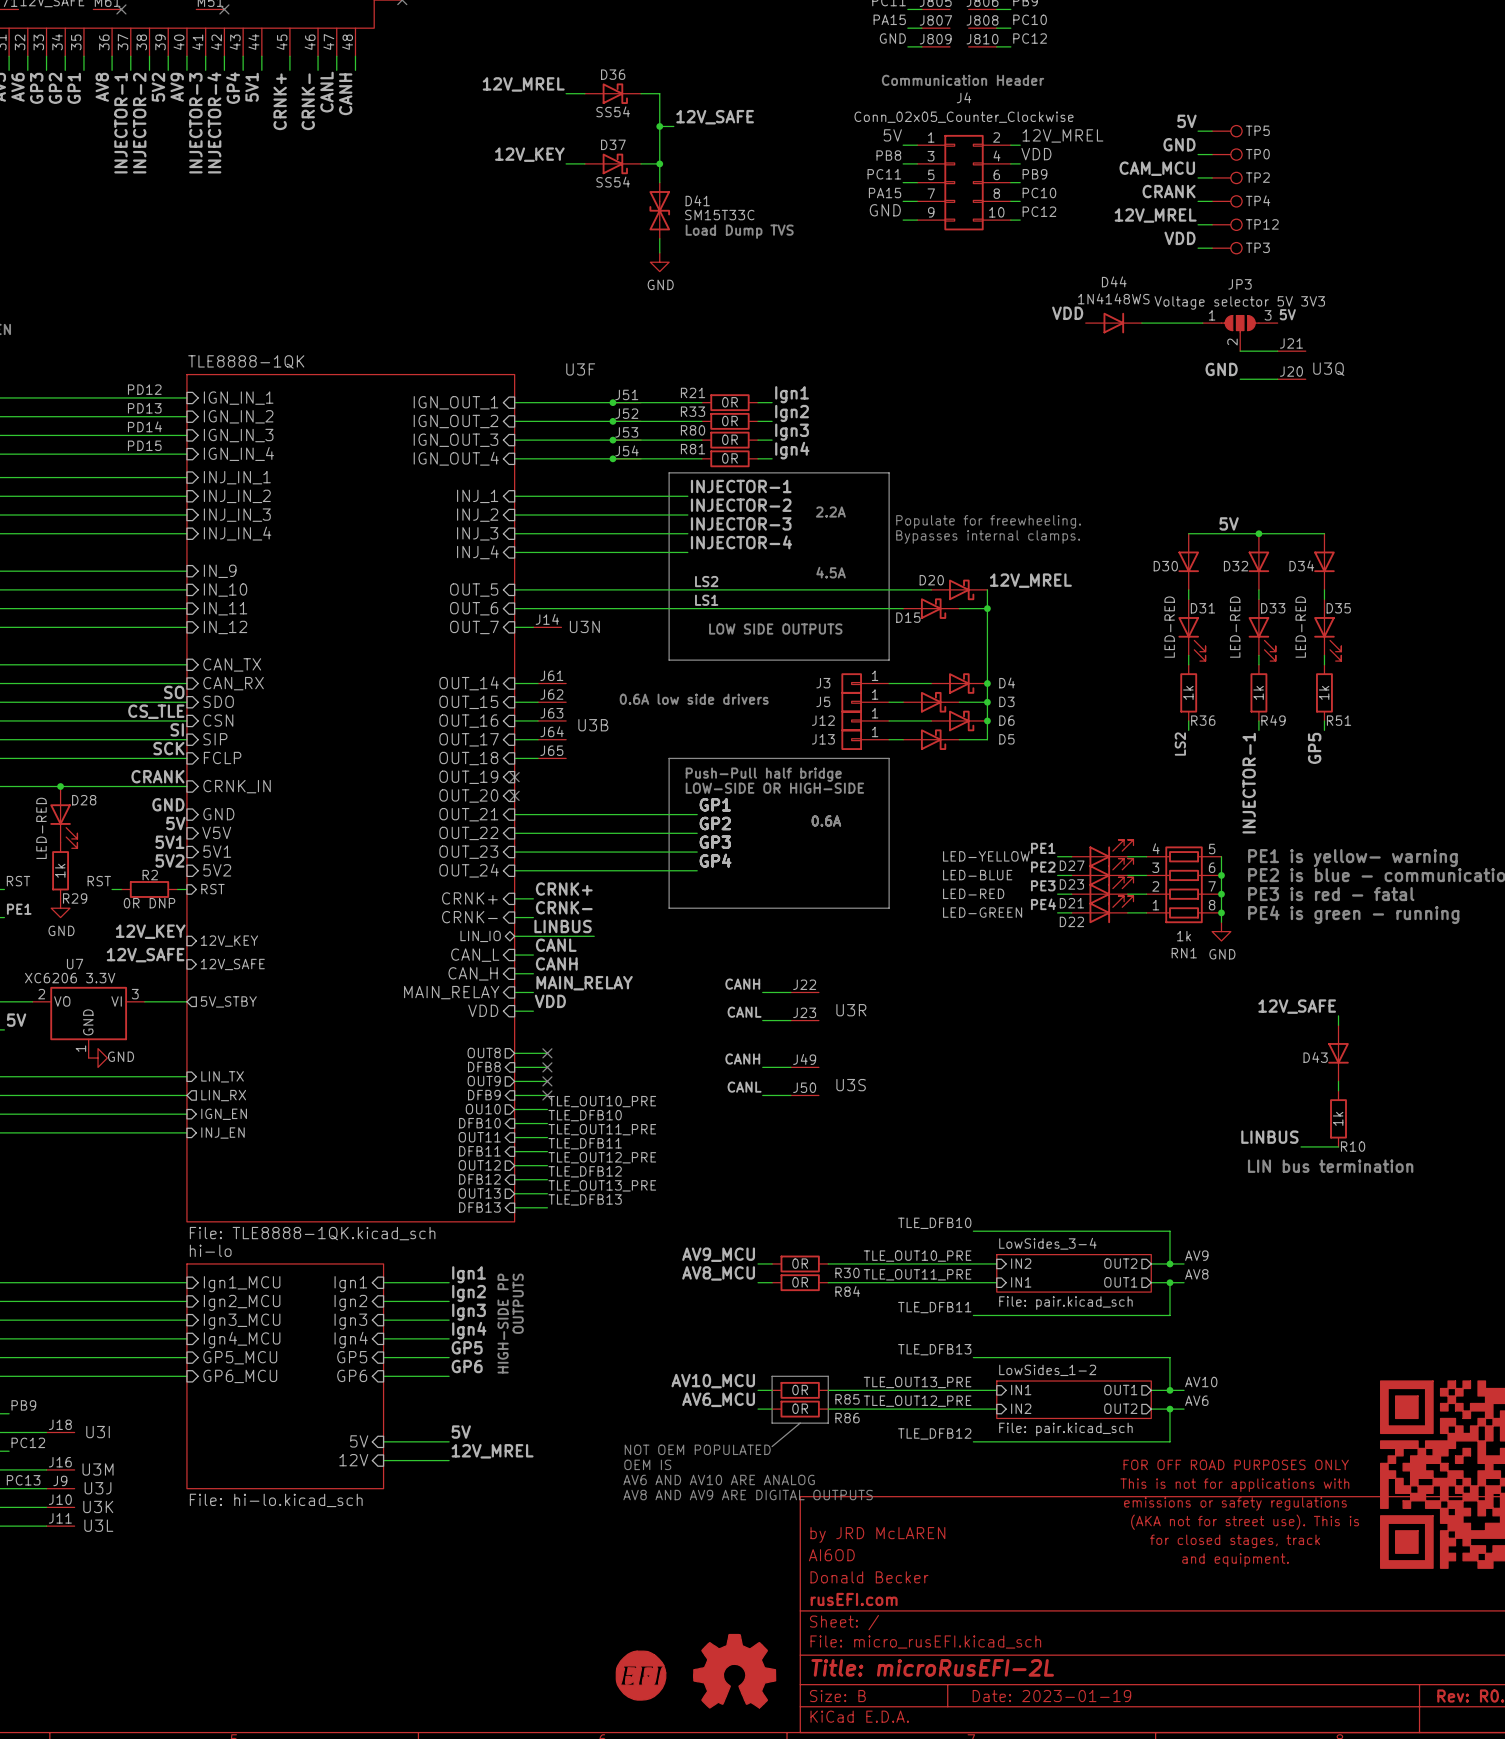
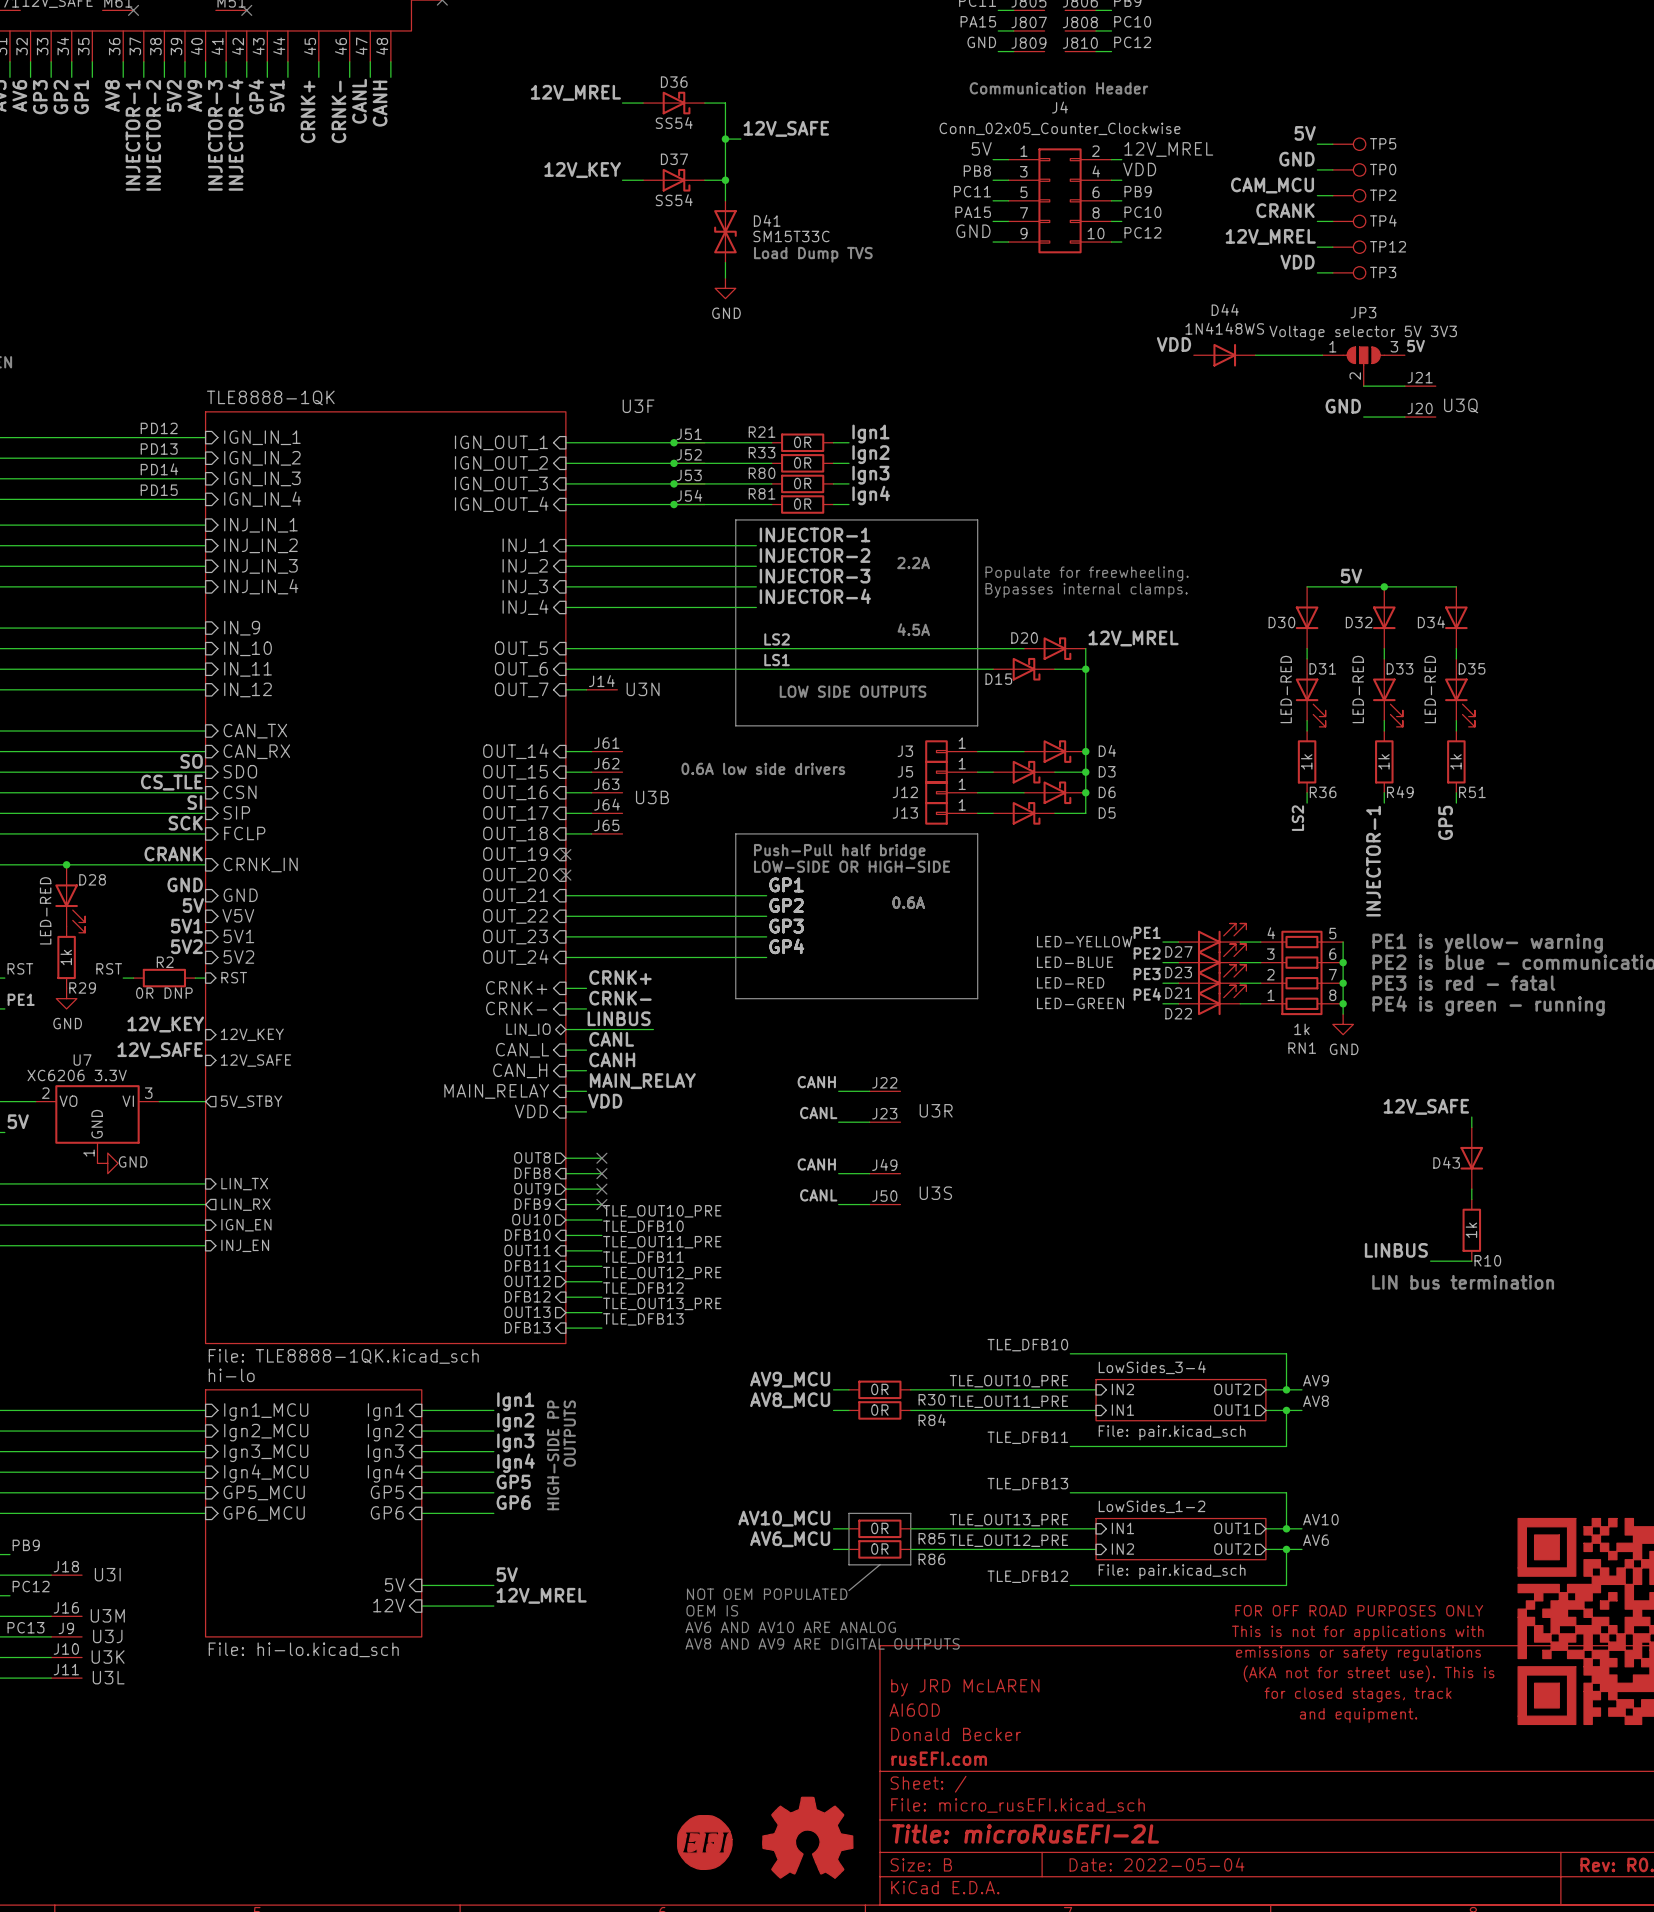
title block: Date: 2023-01-19 (1051, 1696) -> Date: 2022-05-04 (1156, 1864)

